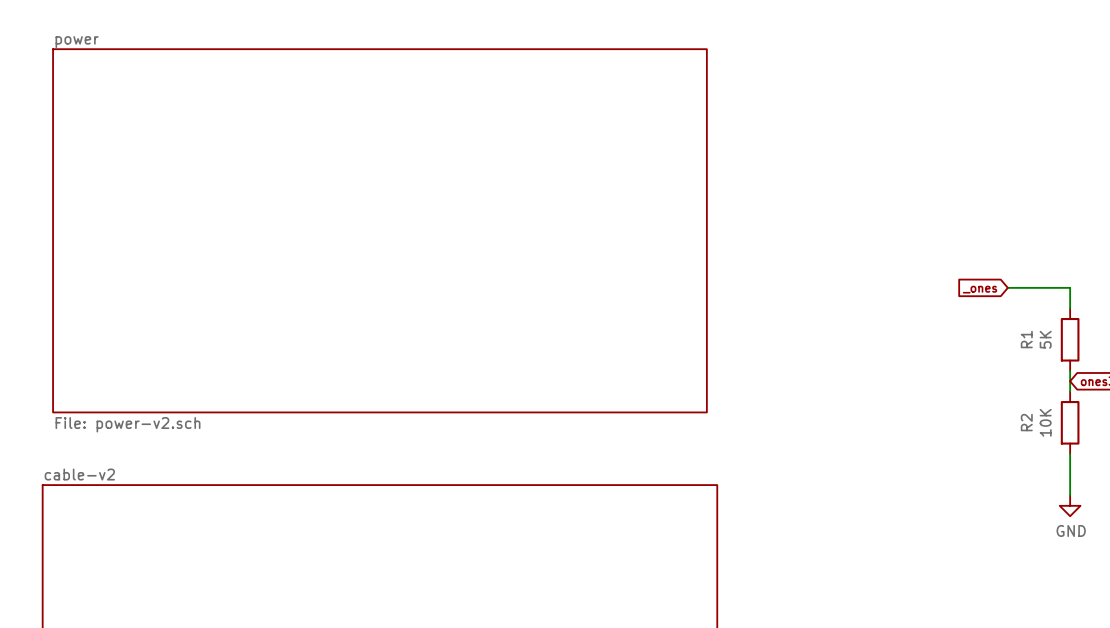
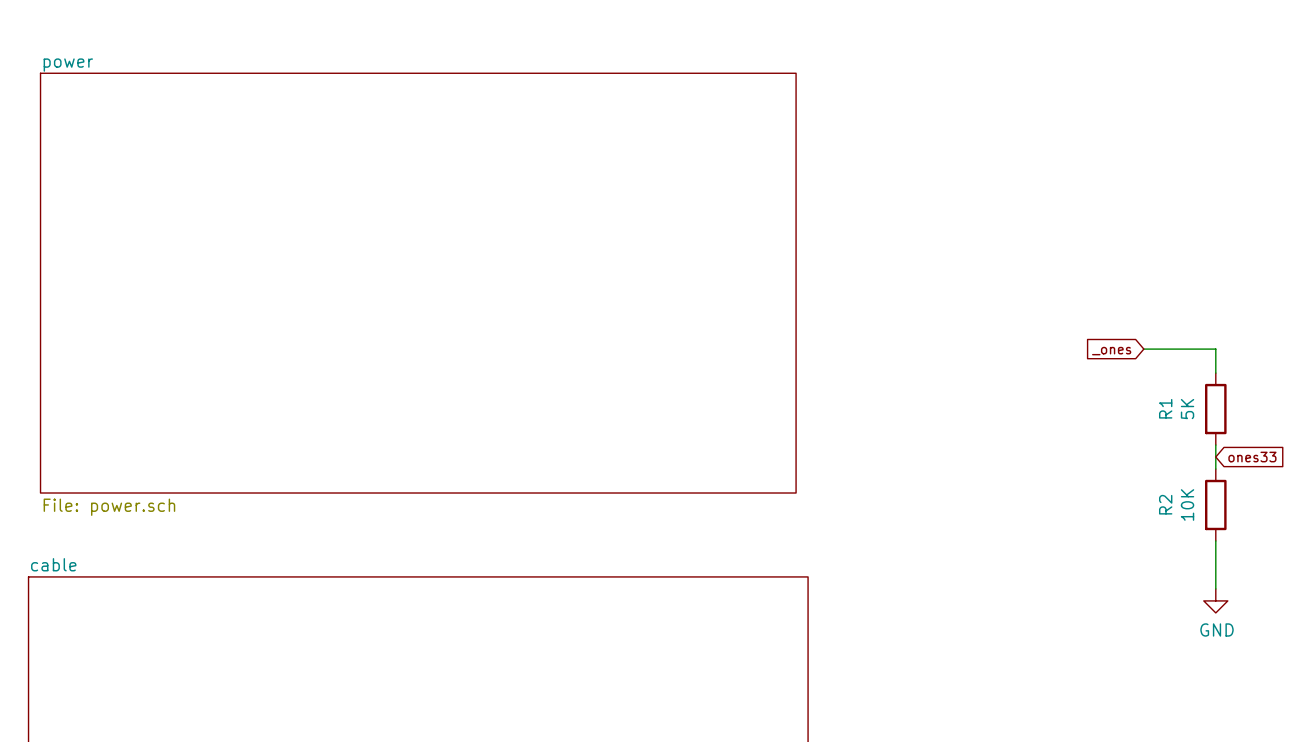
sheet power value: File: power-v2.sch (128, 424) -> File: power.sch (109, 507)
sheet cable-v2 name: cable-v2 (79, 474) -> cable (53, 564)

